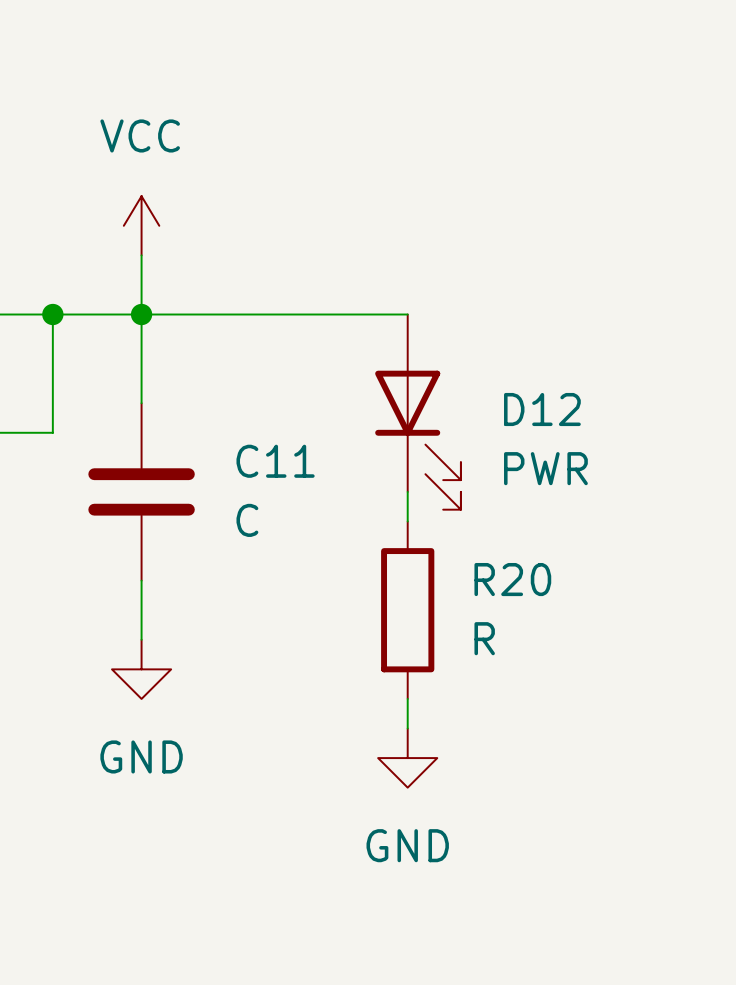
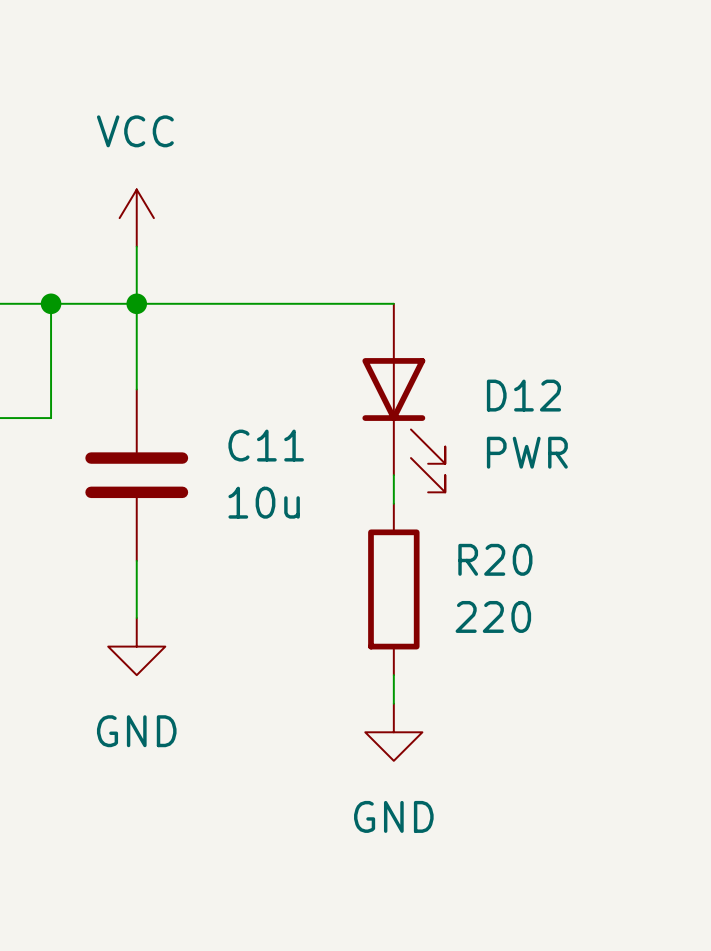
C11 value: C (247, 520) -> 10u (264, 502)
R20 value: R (484, 638) -> 220 (493, 616)

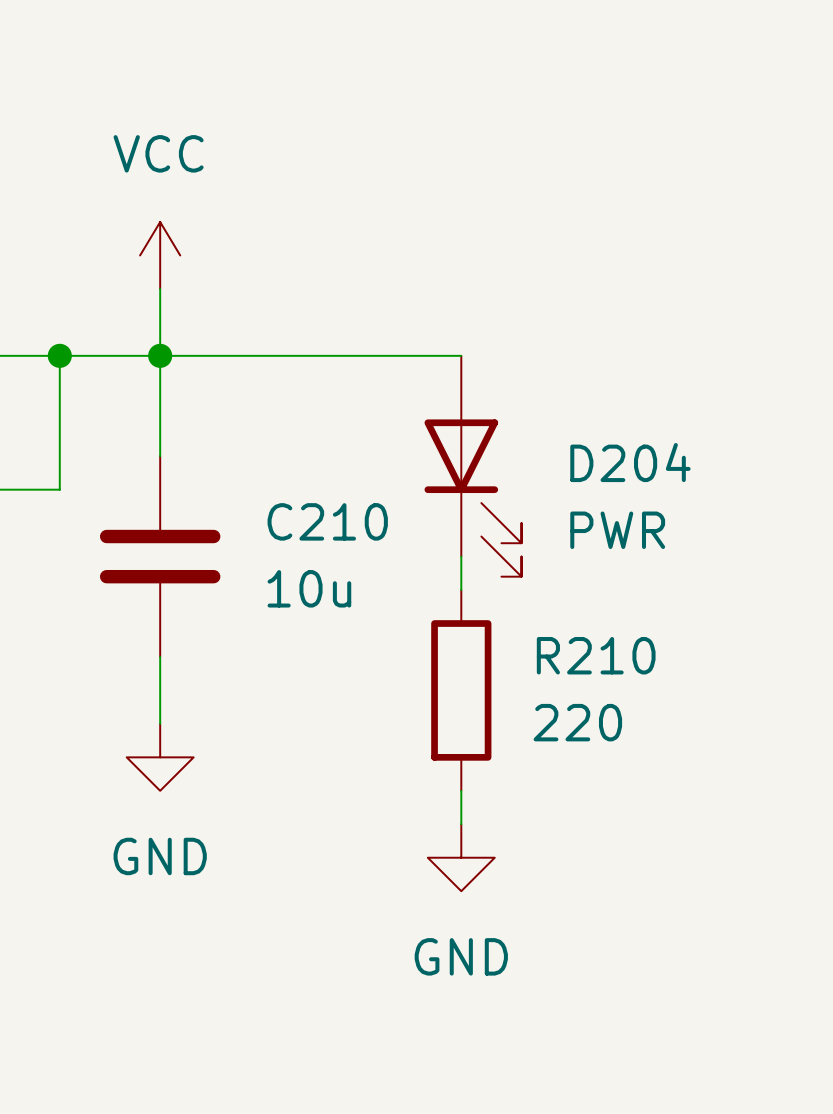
D12 name: D12 (523, 395) -> D204 (630, 462)
C11 name: C11 (266, 445) -> C210 (327, 521)
R20 name: R20 (495, 559) -> R210 (596, 655)

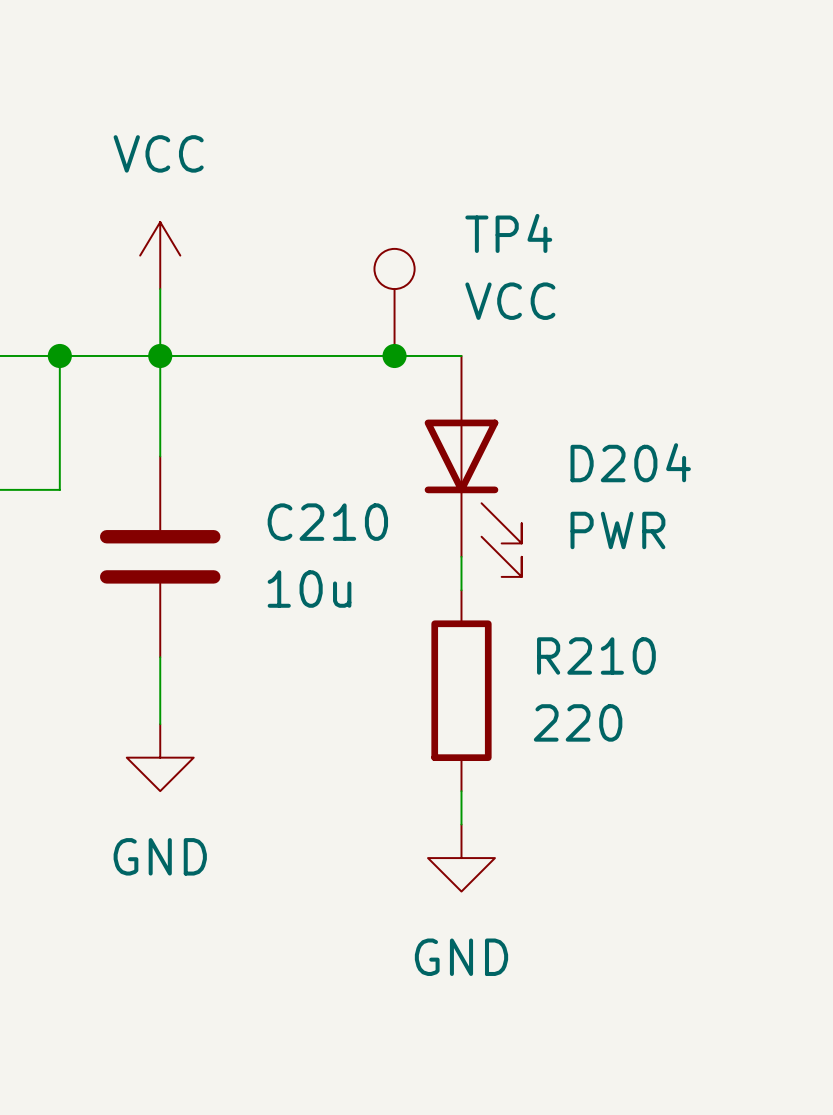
TP4: none -> VCC (394, 302)
junction: none -> (394, 355)

